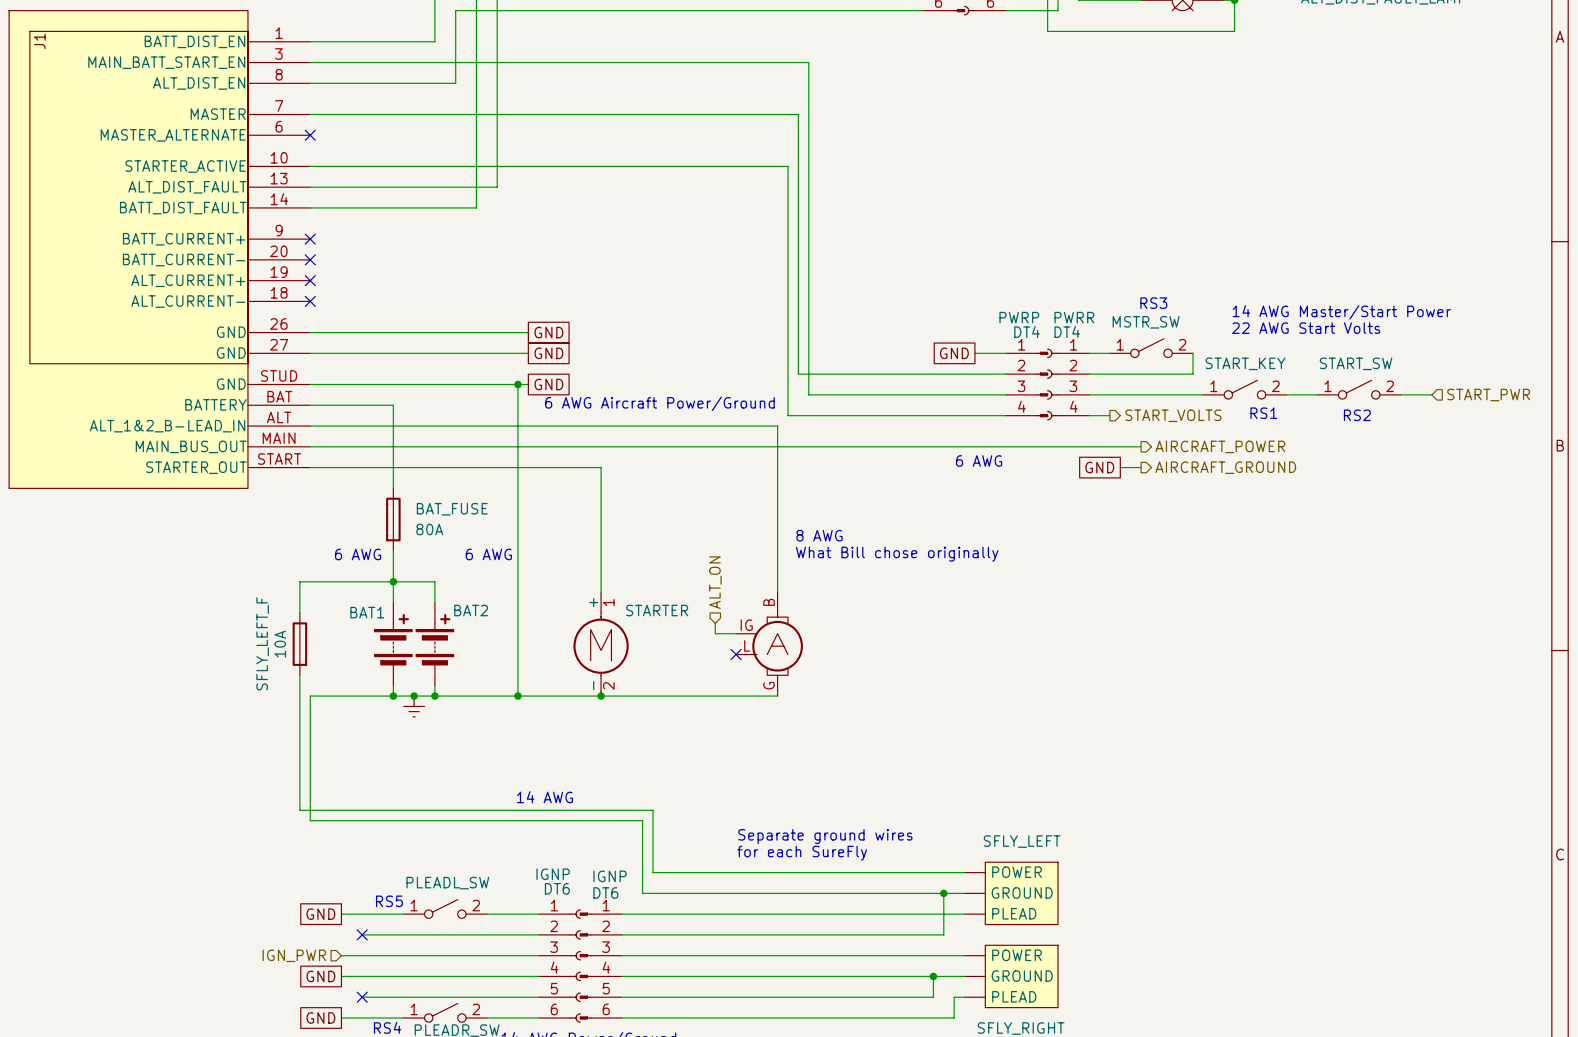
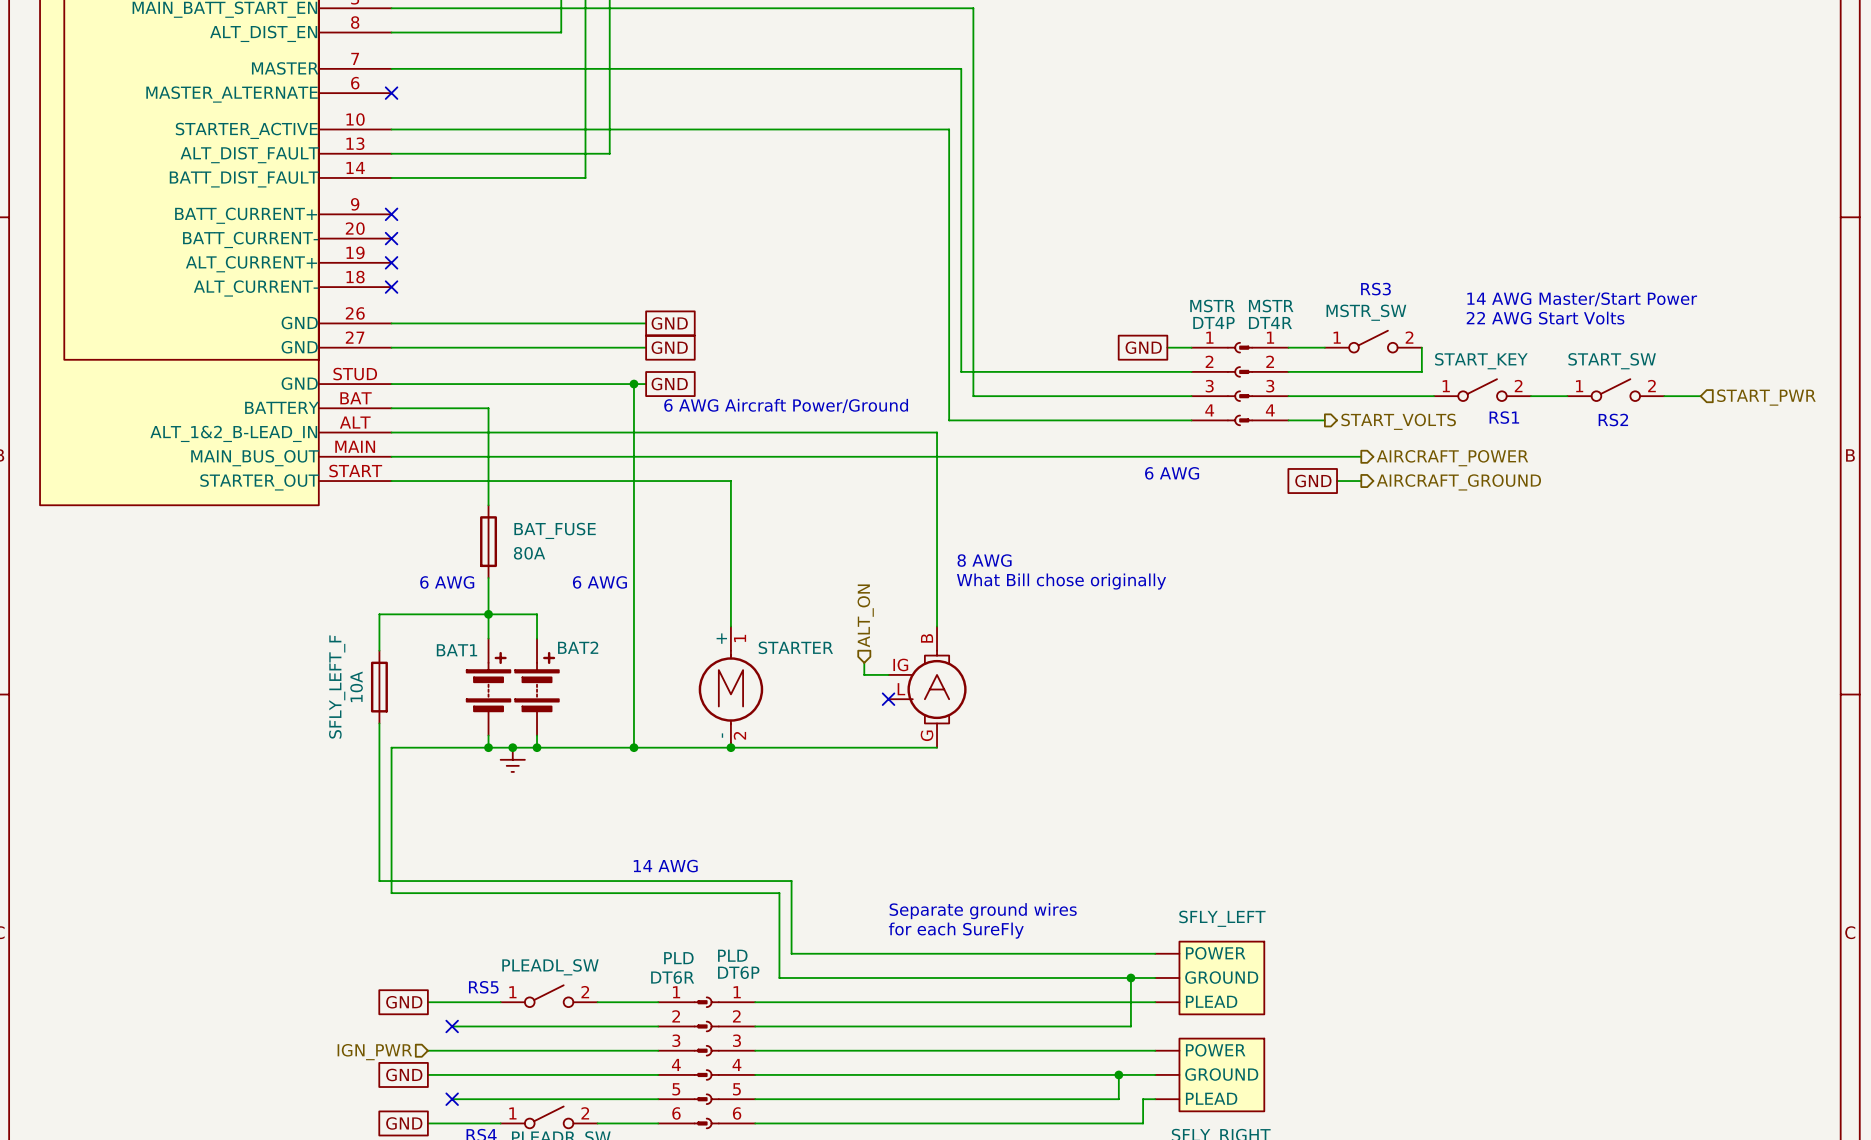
MSTR: none -> DT4P (1216, 384)
PWRP: DT4 (1027, 384) -> none
MSTR: none -> DT4R (1263, 384)
PWRR: DT4 (1068, 384) -> none
IGNP: DT6 (559, 966) -> none
PLD: none -> DT6R (682, 1062)
IGNP: DT6 (600, 966) -> none
PLD: none -> DT6P (730, 1062)

